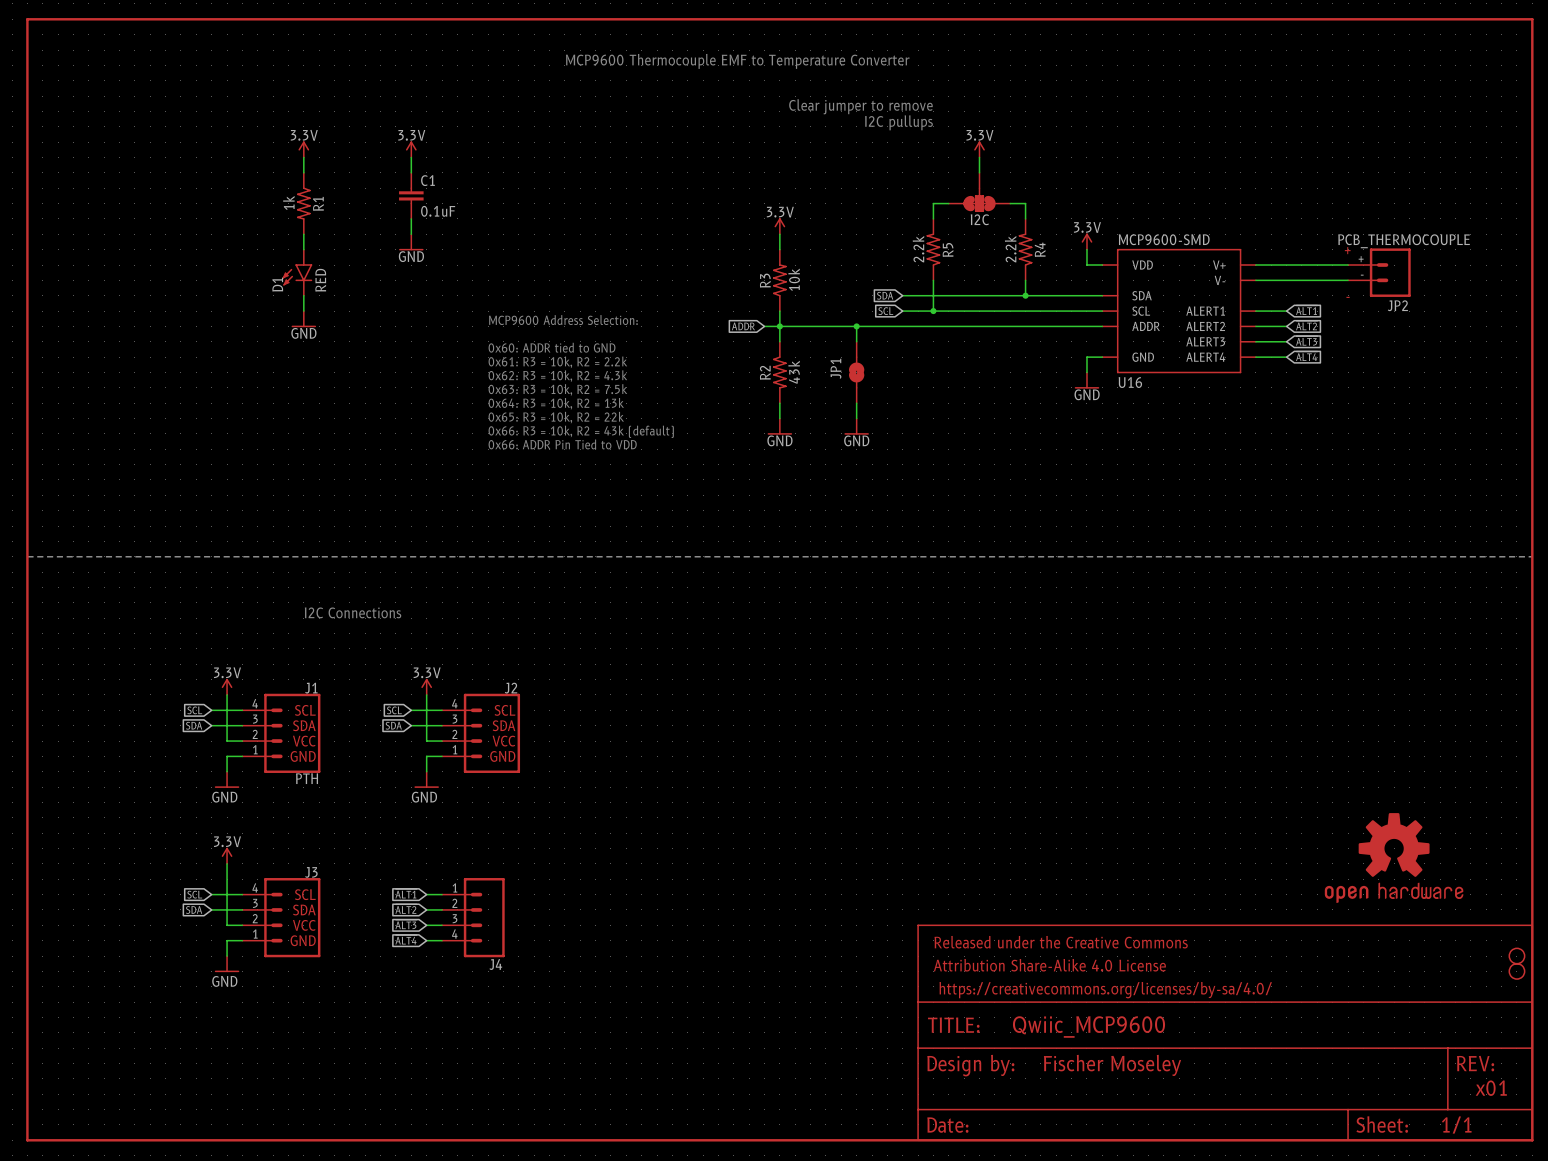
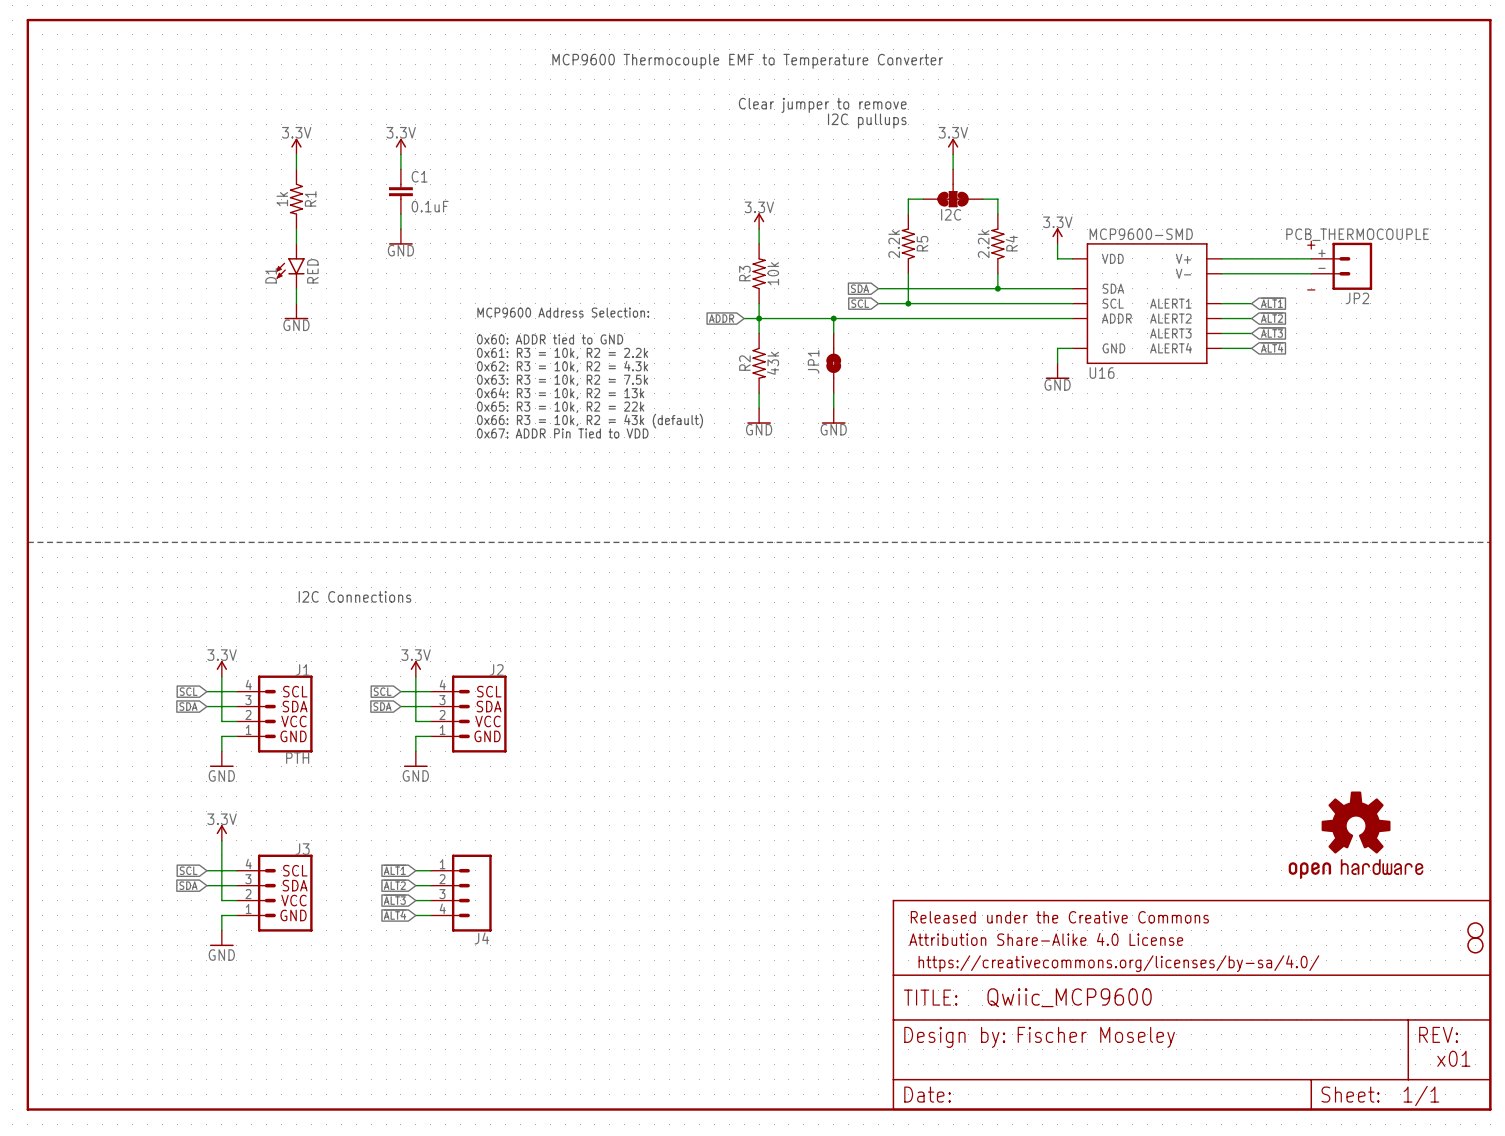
text: 0x66: ADDR Pin Tied to VDD (562, 444) -> 0x67: ADDR Pin Tied to VDD (562, 433)

